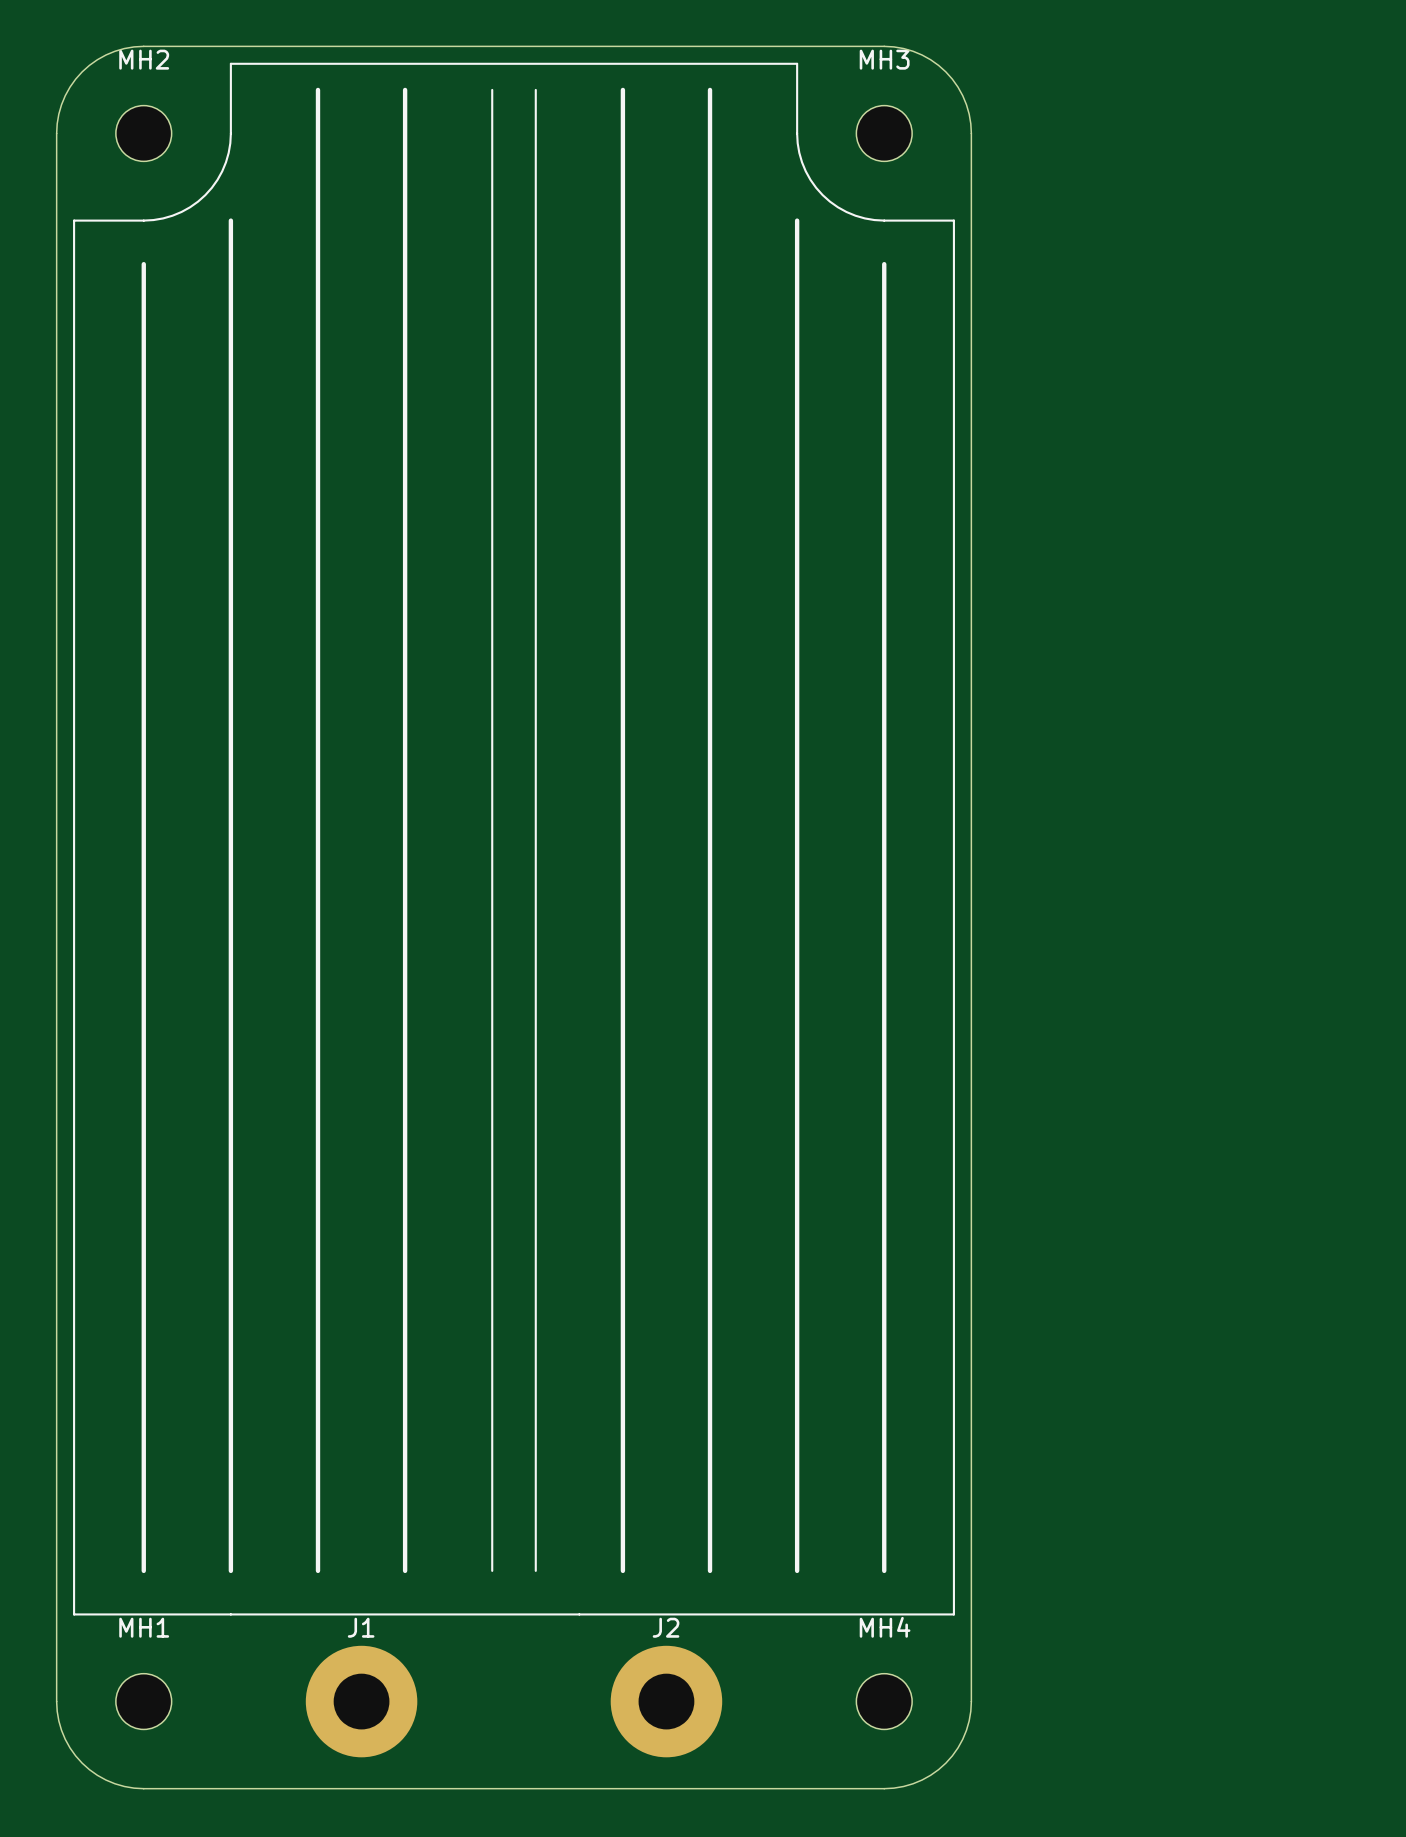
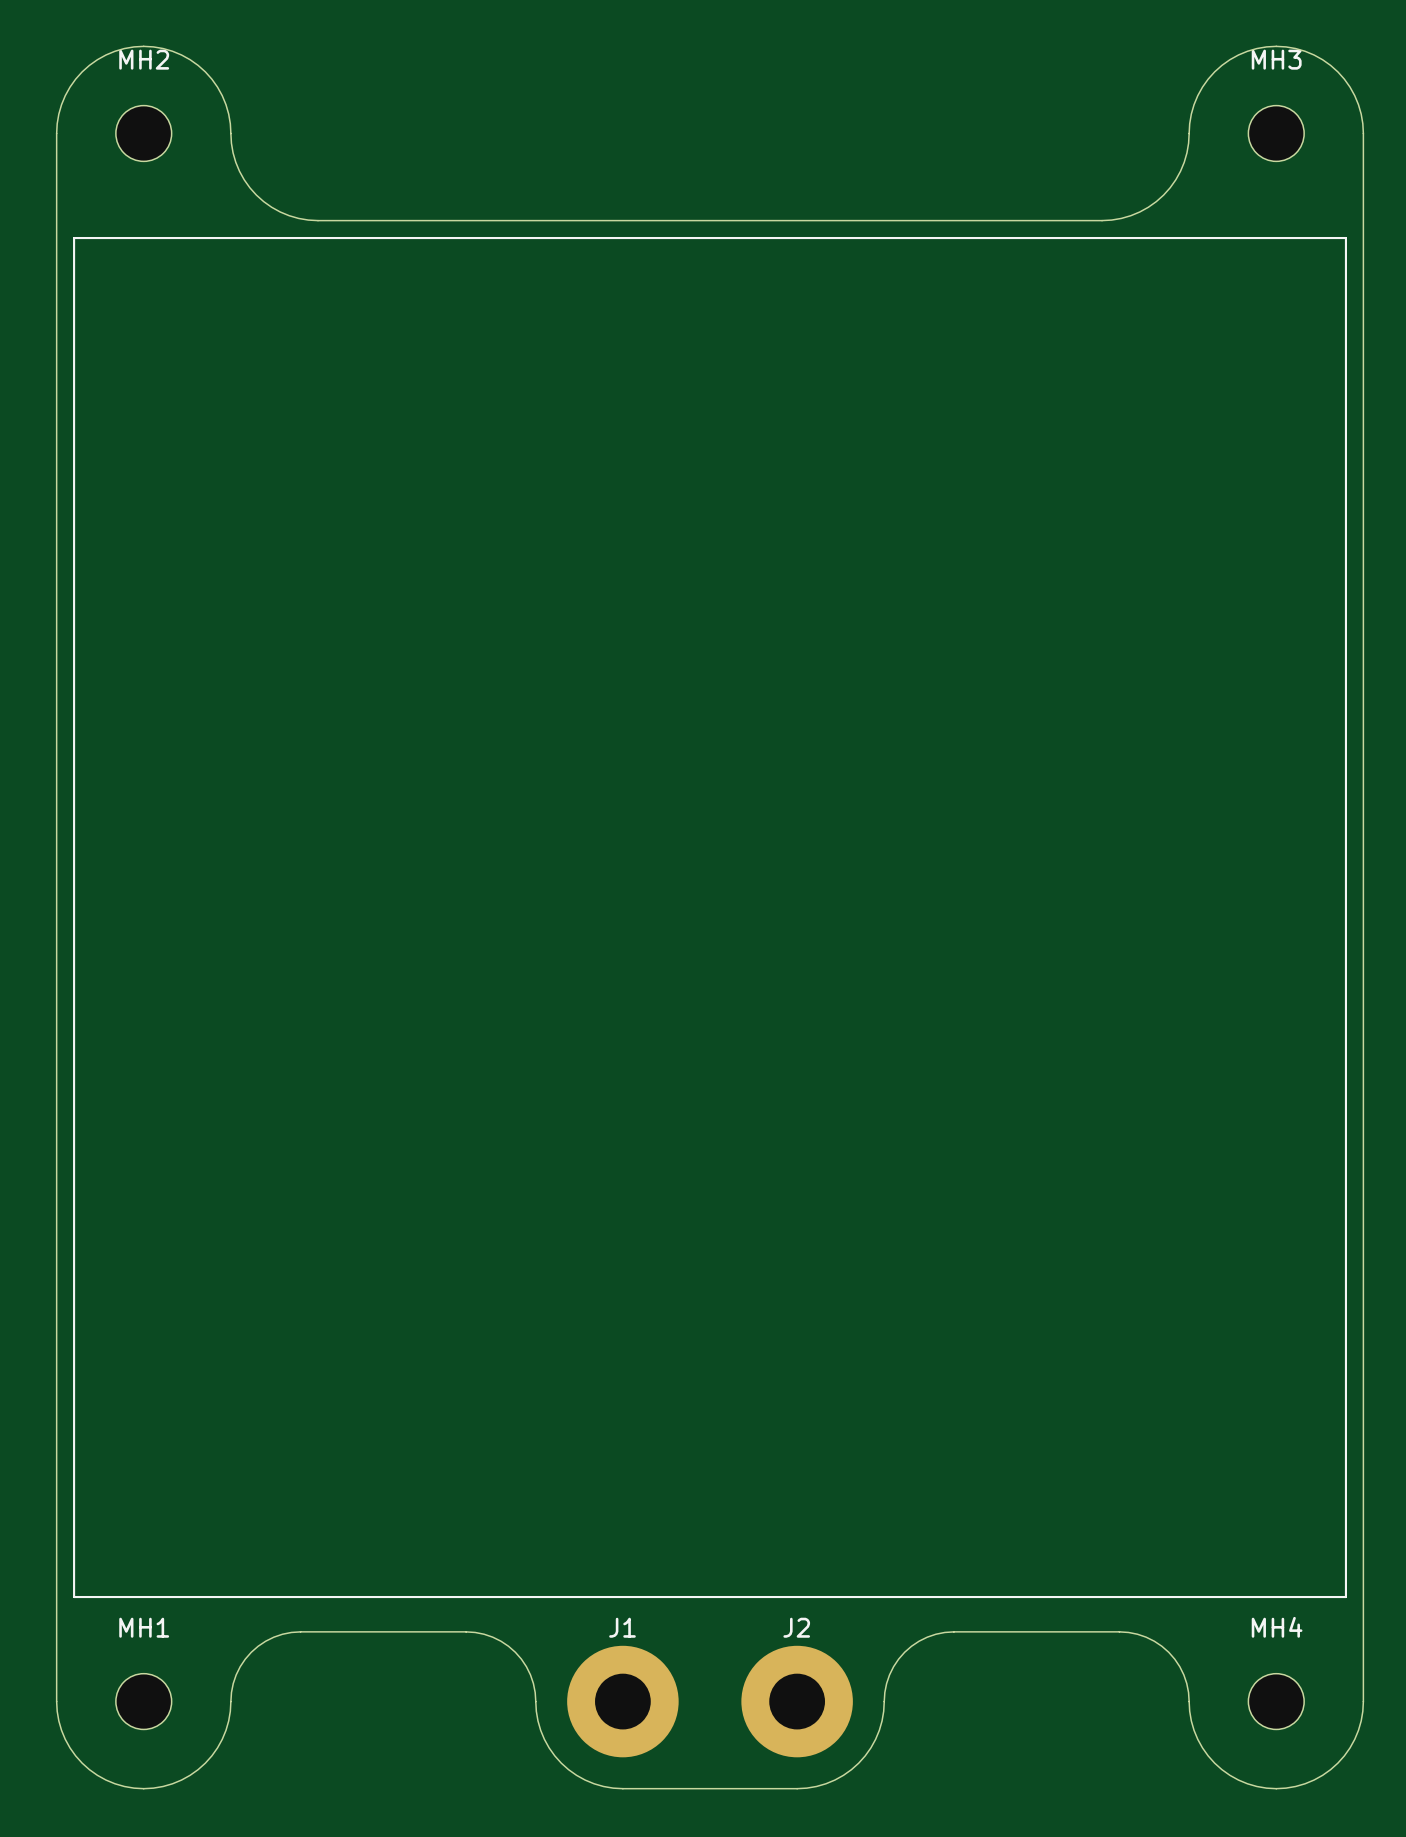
board edge: (143, 46) (894, 46) (913, 51) (938, 65) (958, 87) (966, 104) (971, 133) (970, 1711) (966, 1730) (958, 1747) (945, 1763) (922, 1780) (894, 1788) (797, 1788) -> (143, 46) (172, 51) (190, 59) (205, 71) (217, 87) (225, 104) (230, 123) (233, 152) (239, 171) (249, 187) (263, 201) (280, 211) (298, 218) (318, 220) (1111, 220) (1130, 215) (1148, 207) (1170, 187) (1184, 162) (1188, 143) (1191, 114) (1197, 95) (1214, 71) (1238, 55) (1266, 46) (1286, 46) (1305, 51) (1322, 59) (1337, 71) (1350, 87) (1358, 104) (1363, 133) (1363, 1701) (1358, 1730) (1350, 1747) (1337, 1763) (1314, 1780) (1286, 1788) (1256, 1786) (1229, 1775) (1214, 1763) (1202, 1747) (1191, 1720) (1188, 1692) (1183, 1674) (1174, 1659) (1154, 1641) (1137, 1634) (1119, 1631) (944, 1632) (919, 1641) (904, 1652) (893, 1666) (886, 1683) (879, 1730) (870, 1747) (858, 1763) (843, 1775) (825, 1783) (797, 1788)
line: (318, 89) (318, 1570) -> none
line: (405, 89) (405, 1570) -> none
line: (492, 89) (492, 1570) -> none
line: (535, 89) (535, 1570) -> none
line: (622, 89) (622, 1570) -> none
line: (710, 89) (710, 1570) -> none
MH3 position: (884, 133) -> (1276, 133)
line: (230, 220) (230, 1570) -> none
line: (797, 220) (797, 1570) -> none
line: (74, 238) (74, 220) (143, 220) (163, 218) (190, 207) (205, 195) (222, 171) (228, 152) (230, 133) (230, 63) (797, 63) (797, 133) (799, 152) (810, 179) (822, 195) (837, 207) (864, 218) (884, 220) (953, 220) (953, 1614) (74, 1614) (74, 1597) -> (74, 238) (1345, 238) (1345, 1597) (74, 1597)
line: (143, 264) (143, 1570) -> none
line: (884, 264) (884, 1570) -> none
J1 position: (361, 1701) -> (622, 1701)
J2 position: (666, 1701) -> (797, 1701)
MH4 position: (884, 1701) -> (1276, 1701)
board edge: (143, 1788) (622, 1788) -> (143, 1788) (172, 1783) (190, 1775) (205, 1763) (217, 1747) (225, 1730) (233, 1683) (245, 1659) (265, 1641) (282, 1634) (300, 1631) (466, 1631) (492, 1637) (515, 1652) (526, 1666) (533, 1683) (540, 1730) (554, 1755) (568, 1769) (585, 1780) (603, 1786) (622, 1788)

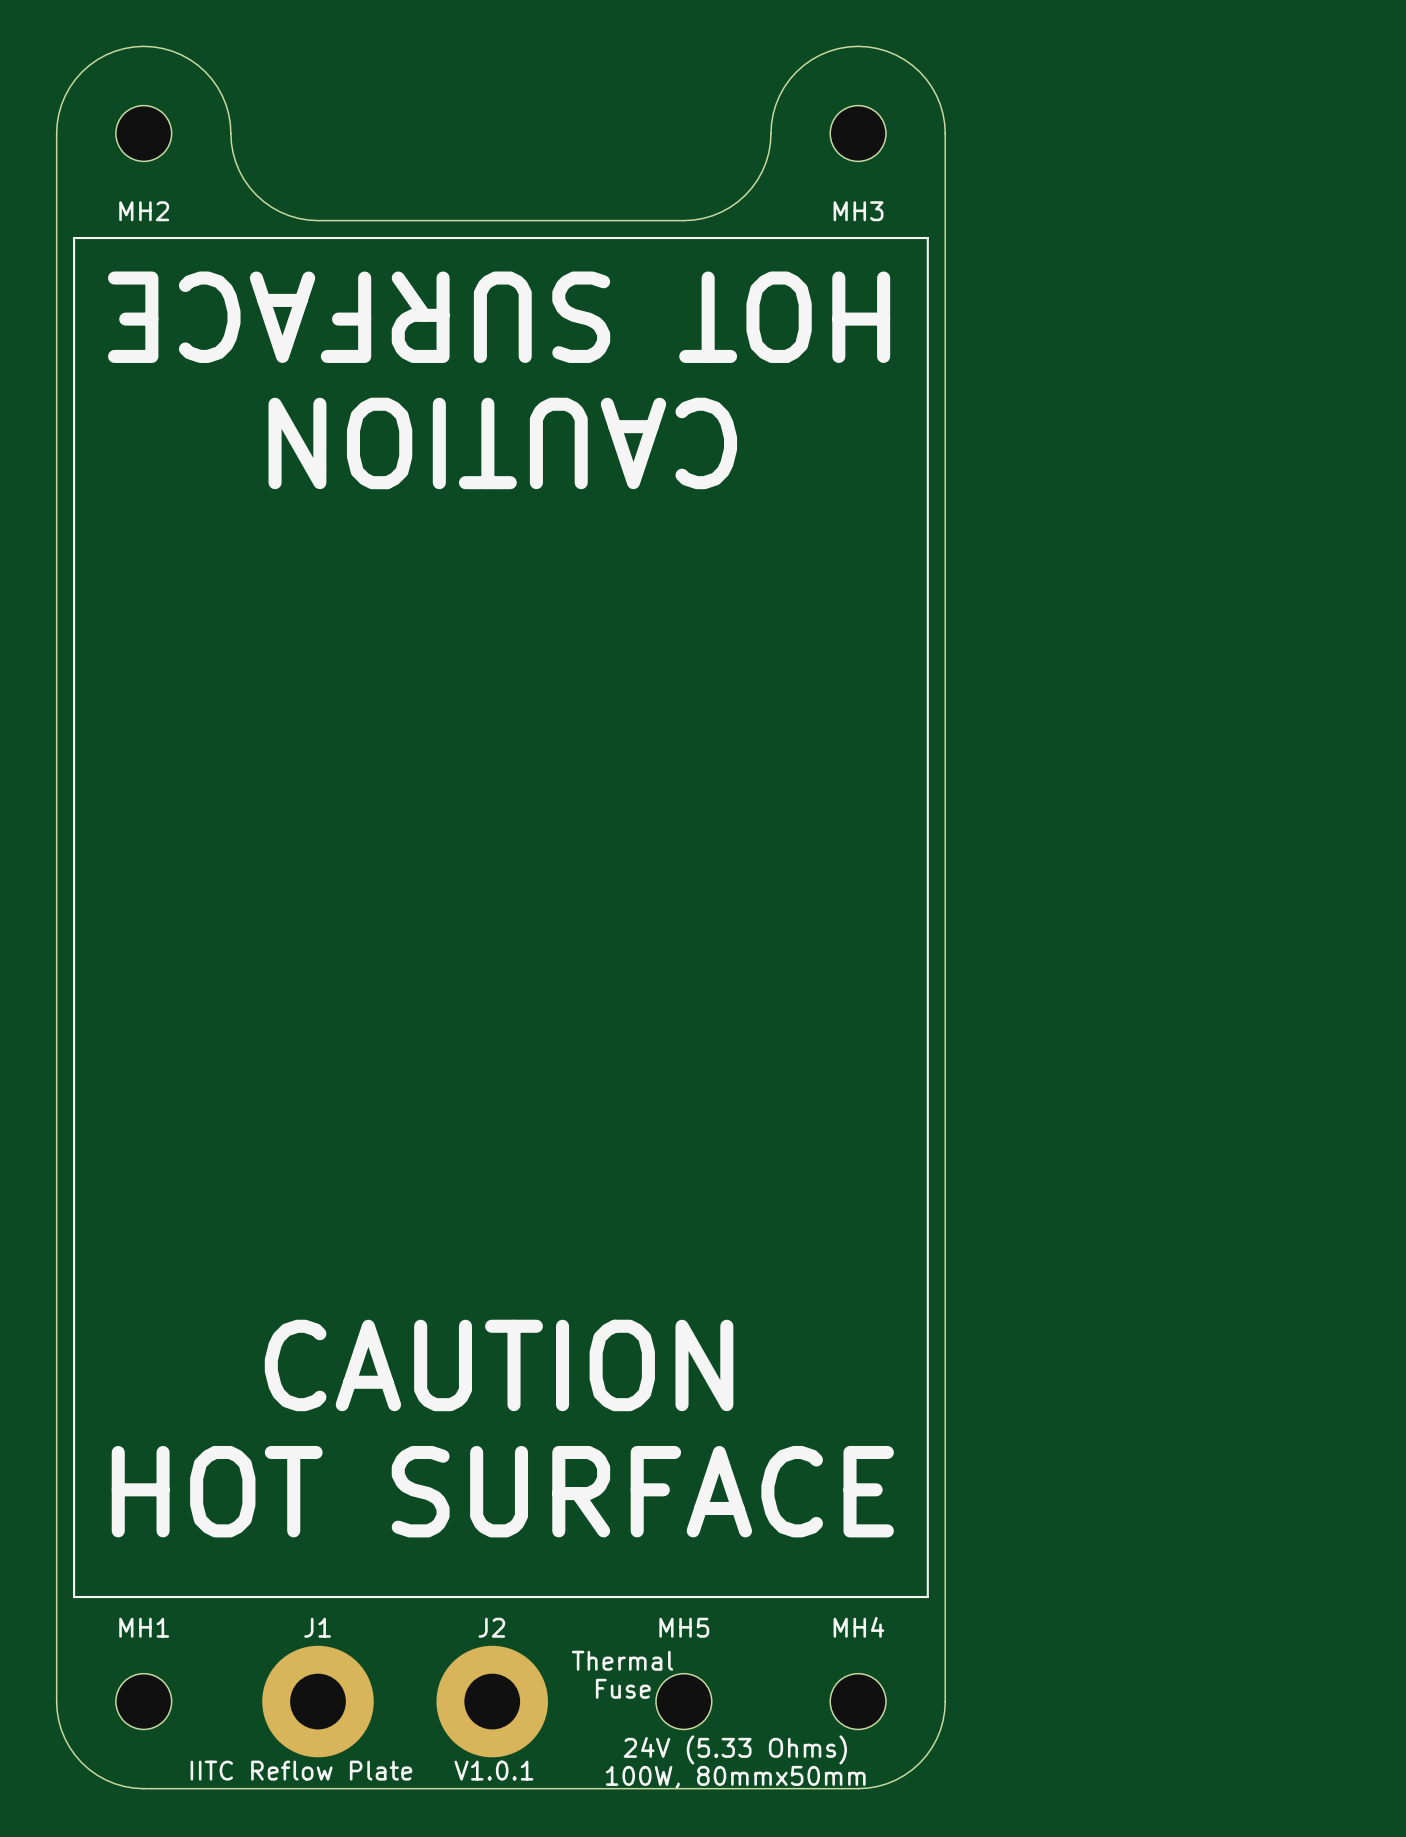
MH2 name position: MH2 (144, 59) -> MH2 (144, 211)
MH3 name position: MH3 (1276, 59) -> MH3 (858, 211)
MH3 position: (1276, 133) -> (858, 133)
board edge: (683, 220) (1102, 220) (1130, 215) (1156, 201) (1175, 179) (1186, 152) (1189, 123) (1194, 104) (1208, 79) (1229, 59) (1247, 51) (1266, 46) (1295, 48) (1314, 55) (1330, 65) (1350, 87) (1358, 104) (1362, 123) (1363, 1701) (1358, 1730) (1350, 1747) (1337, 1763) (1314, 1780) (1286, 1788) (1256, 1786) (1229, 1775) (1214, 1763) (1202, 1747) (1191, 1720) (1188, 1692) (1183, 1674) (1174, 1659) (1154, 1641) (1137, 1634) (1119, 1631) (944, 1632) (919, 1641) (904, 1652) (893, 1666) (886, 1683) (879, 1730) (870, 1747) (858, 1763) (843, 1775) (825, 1783) (797, 1788) -> (683, 220) (703, 218) (721, 211) (738, 201) (751, 187) (766, 162) (770, 143) (773, 114) (779, 95) (796, 71) (820, 55) (848, 46) (867, 46) (886, 51) (904, 59) (919, 71) (936, 95) (943, 114) (945, 133) (944, 1711) (940, 1730) (931, 1747) (919, 1763) (895, 1780) (867, 1788) (797, 1788)
line: (927, 238) (1345, 238) (1345, 1597) (927, 1597) -> (927, 238) (927, 1597)
text: none -> HOT SURFACE (499, 317)
text: none -> CAUTION (502, 443)
text: none -> CAUTION (499, 1365)
text: none -> HOT SURFACE (502, 1491)
text: none -> Thermal (622, 1660)
text: none -> Fuse (623, 1688)
J1 position: (622, 1701) -> (318, 1701)
MH5: none -> (683, 1701)
J2 position: (797, 1701) -> (492, 1701)
MH4 position: (1276, 1701) -> (858, 1701)
text: none -> 24V (5.33 Ohms) (735, 1749)
text: none -> IITC Reflow Plate V1.0.1 (361, 1770)
text: none -> 100W, 80mmx50mm (735, 1777)
board edge: (143, 1788) (172, 1783) (190, 1775) (205, 1763) (217, 1747) (225, 1730) (233, 1683) (245, 1659) (265, 1641) (282, 1634) (300, 1631) (466, 1631) (492, 1637) (515, 1652) (526, 1666) (533, 1683) (540, 1730) (554, 1755) (568, 1769) (585, 1780) (603, 1786) (622, 1788) -> (143, 1788) (622, 1788)

